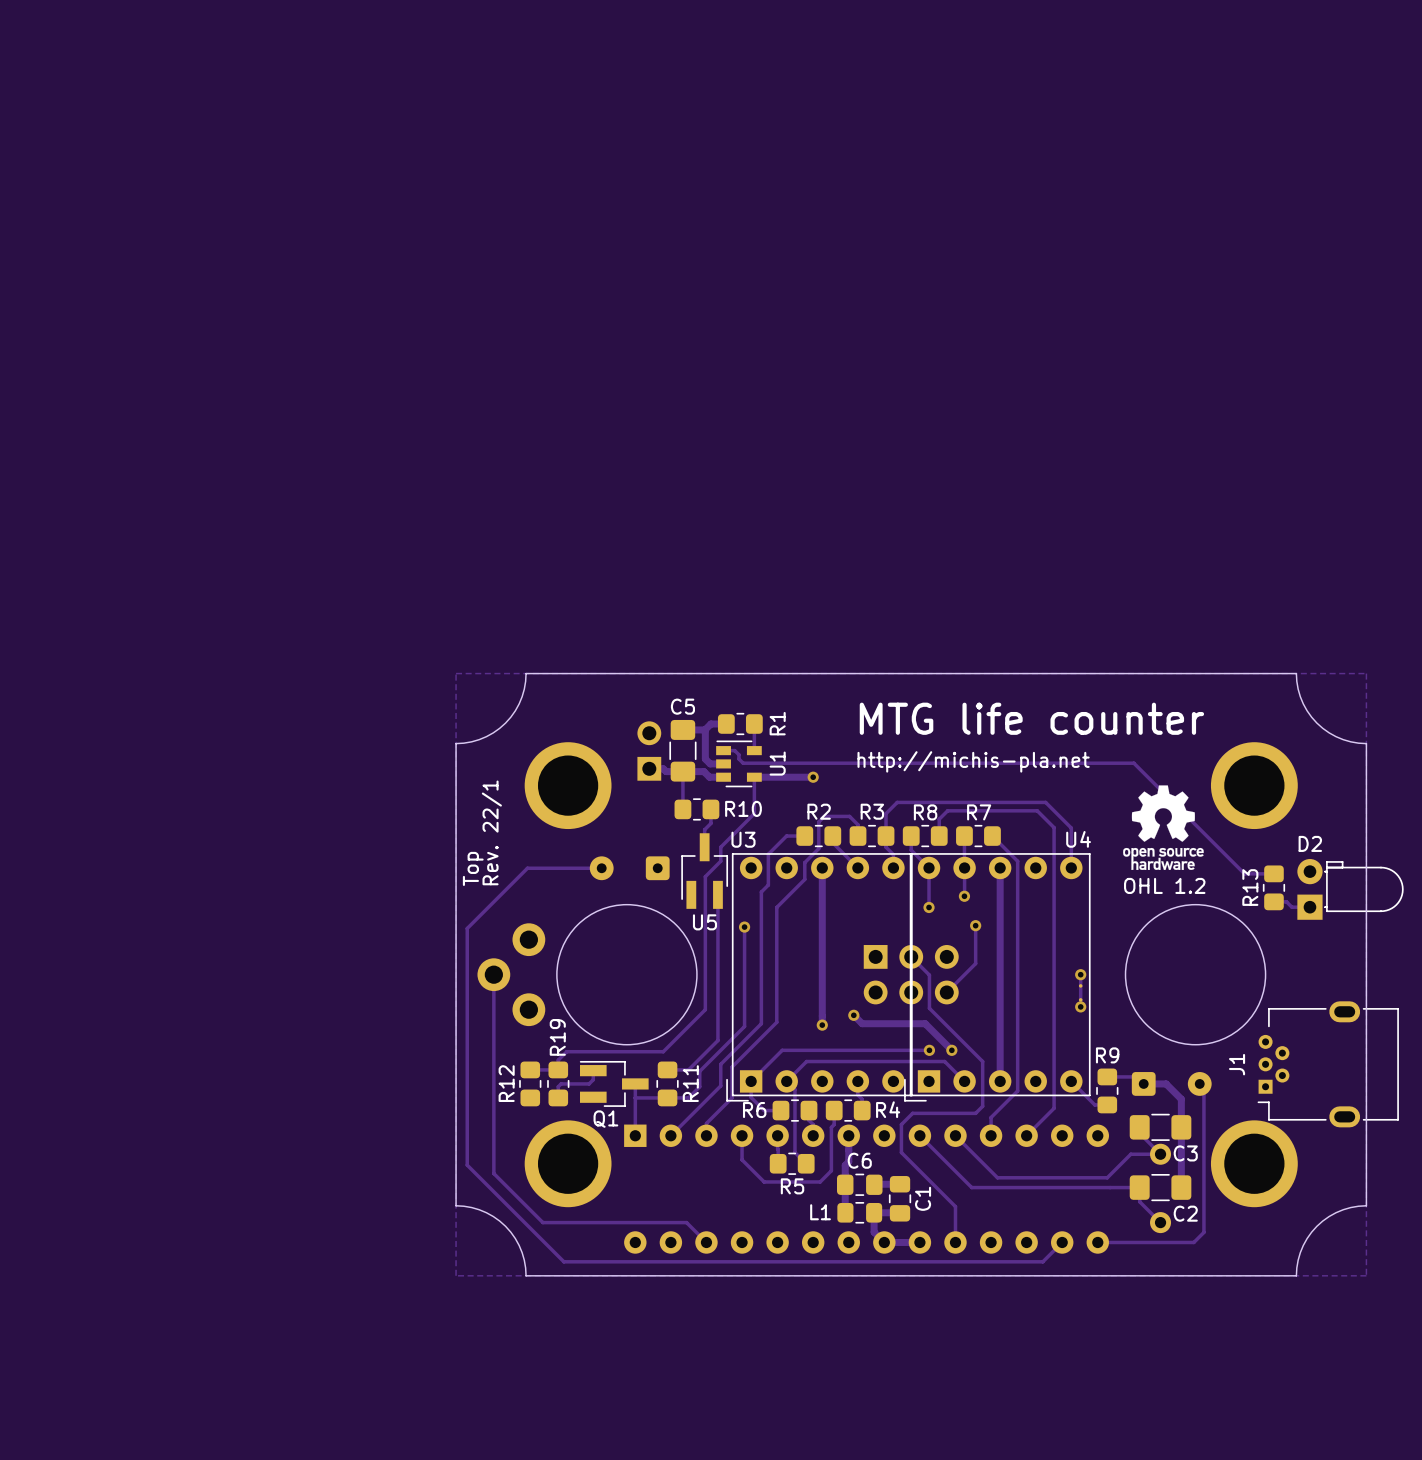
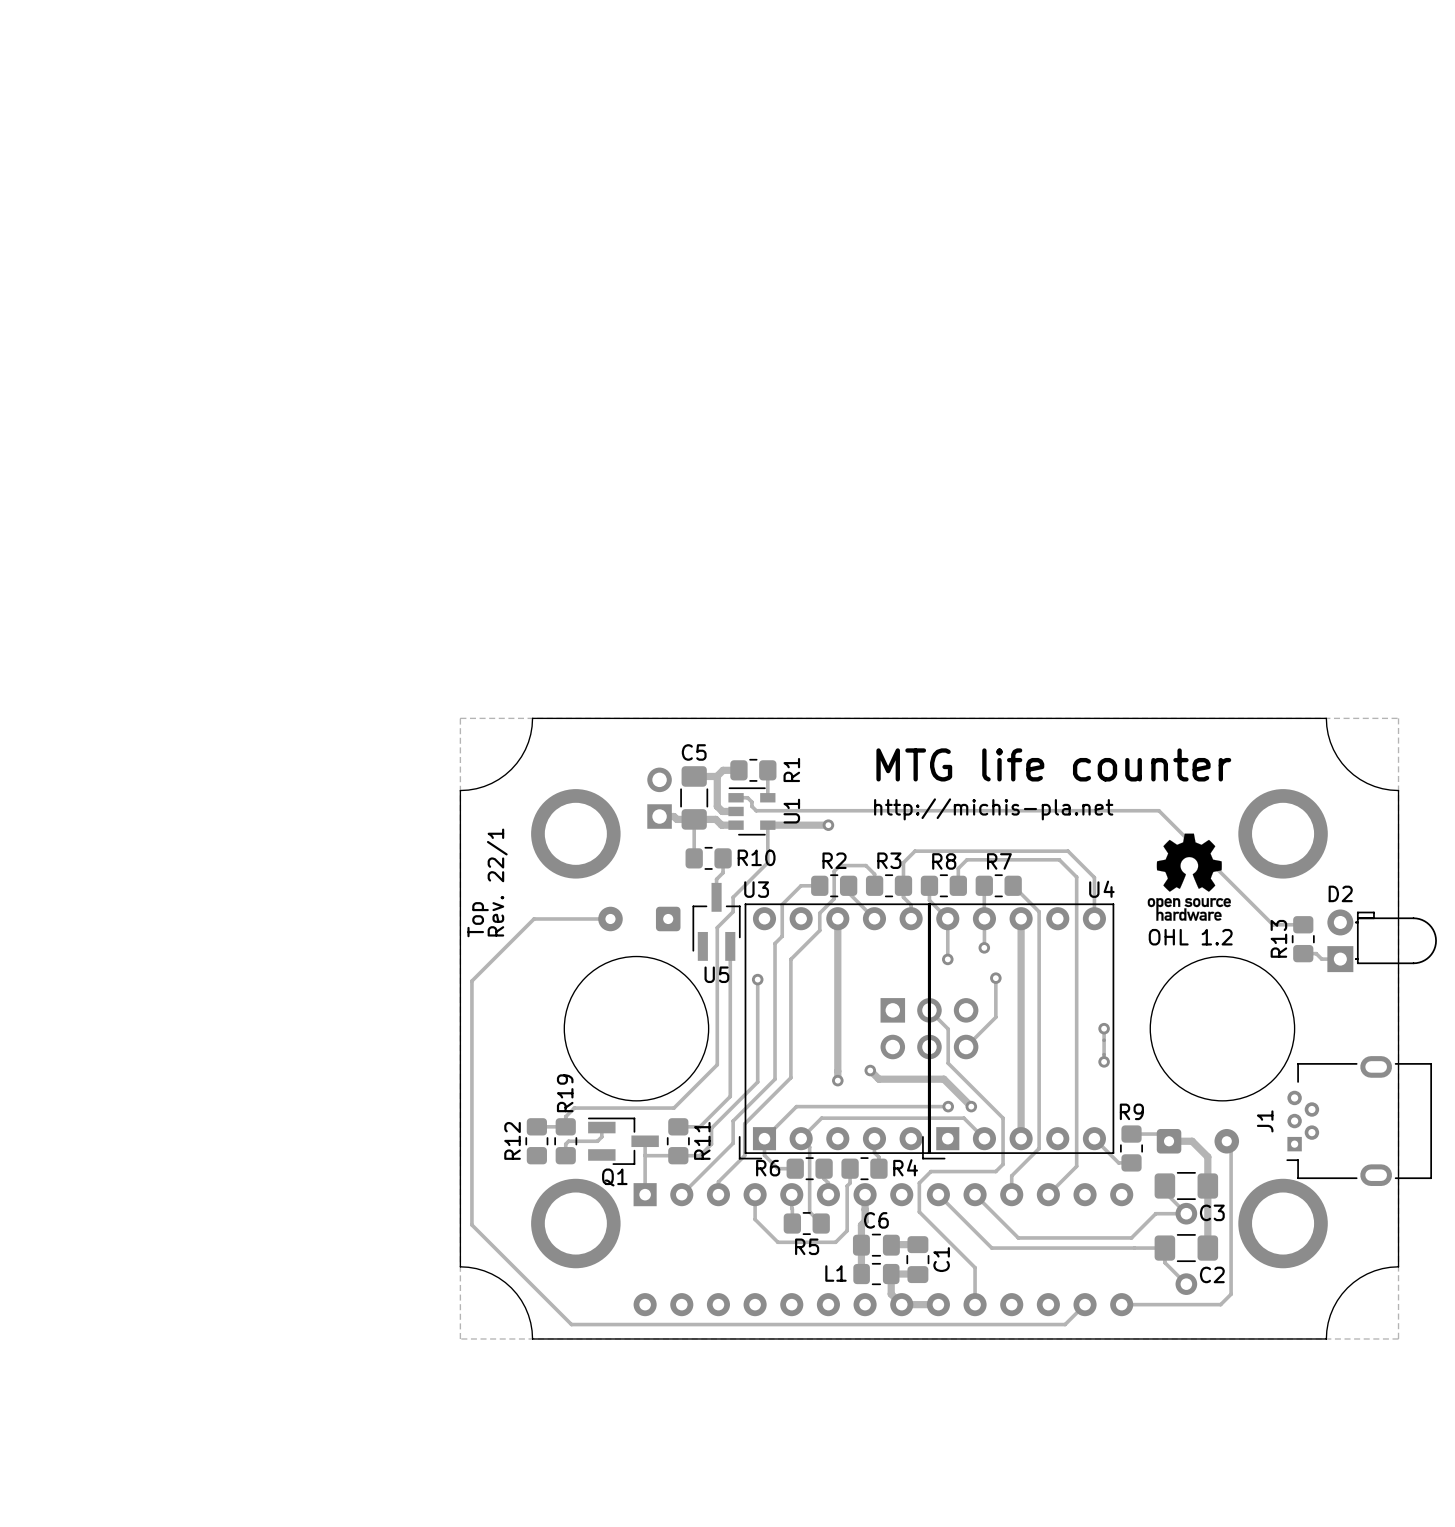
track: (493, 974) (493, 1173) (542, 1222) (686, 1222) (706, 1242) -> none
part: (511, 974) -> none

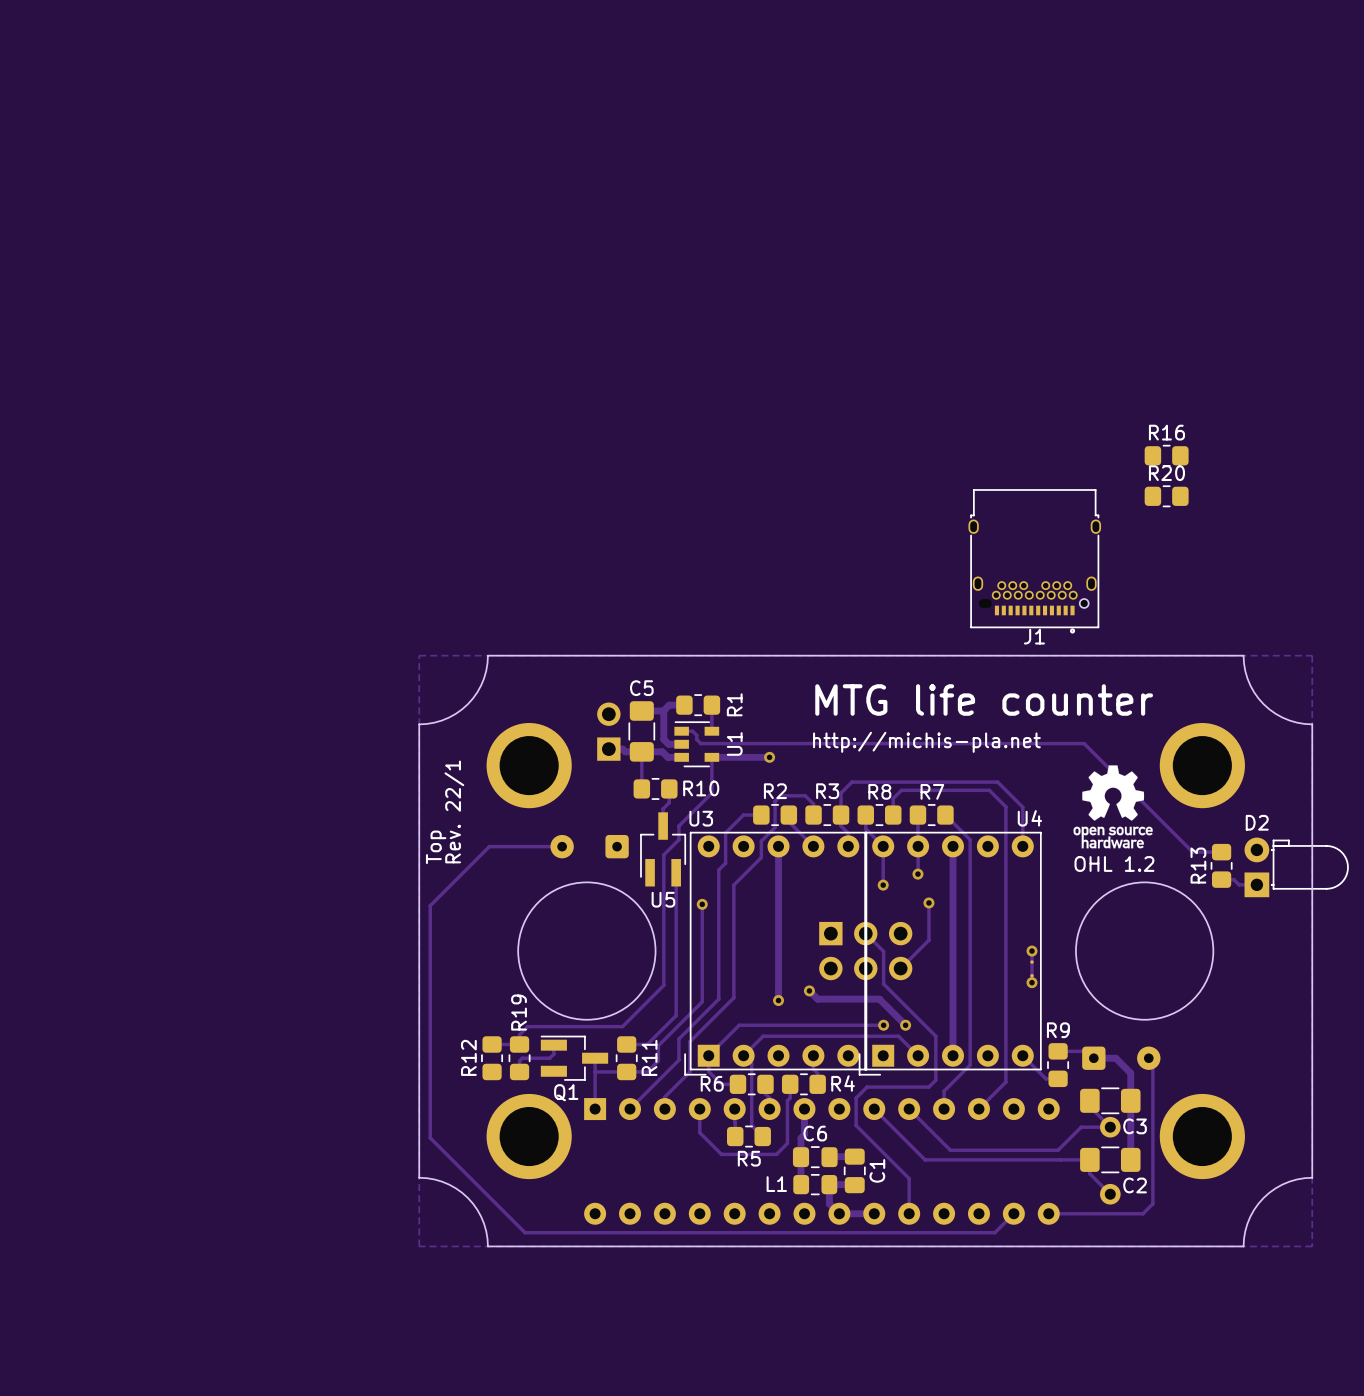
R16: none -> (1166, 455)
R20: none -> (1166, 496)
J1 footprint: [1286, 1056, 1433, 1187] -> [968, 489, 1102, 634]
J1 name position: J1 (1265, 1121) -> J1 (1034, 636)

